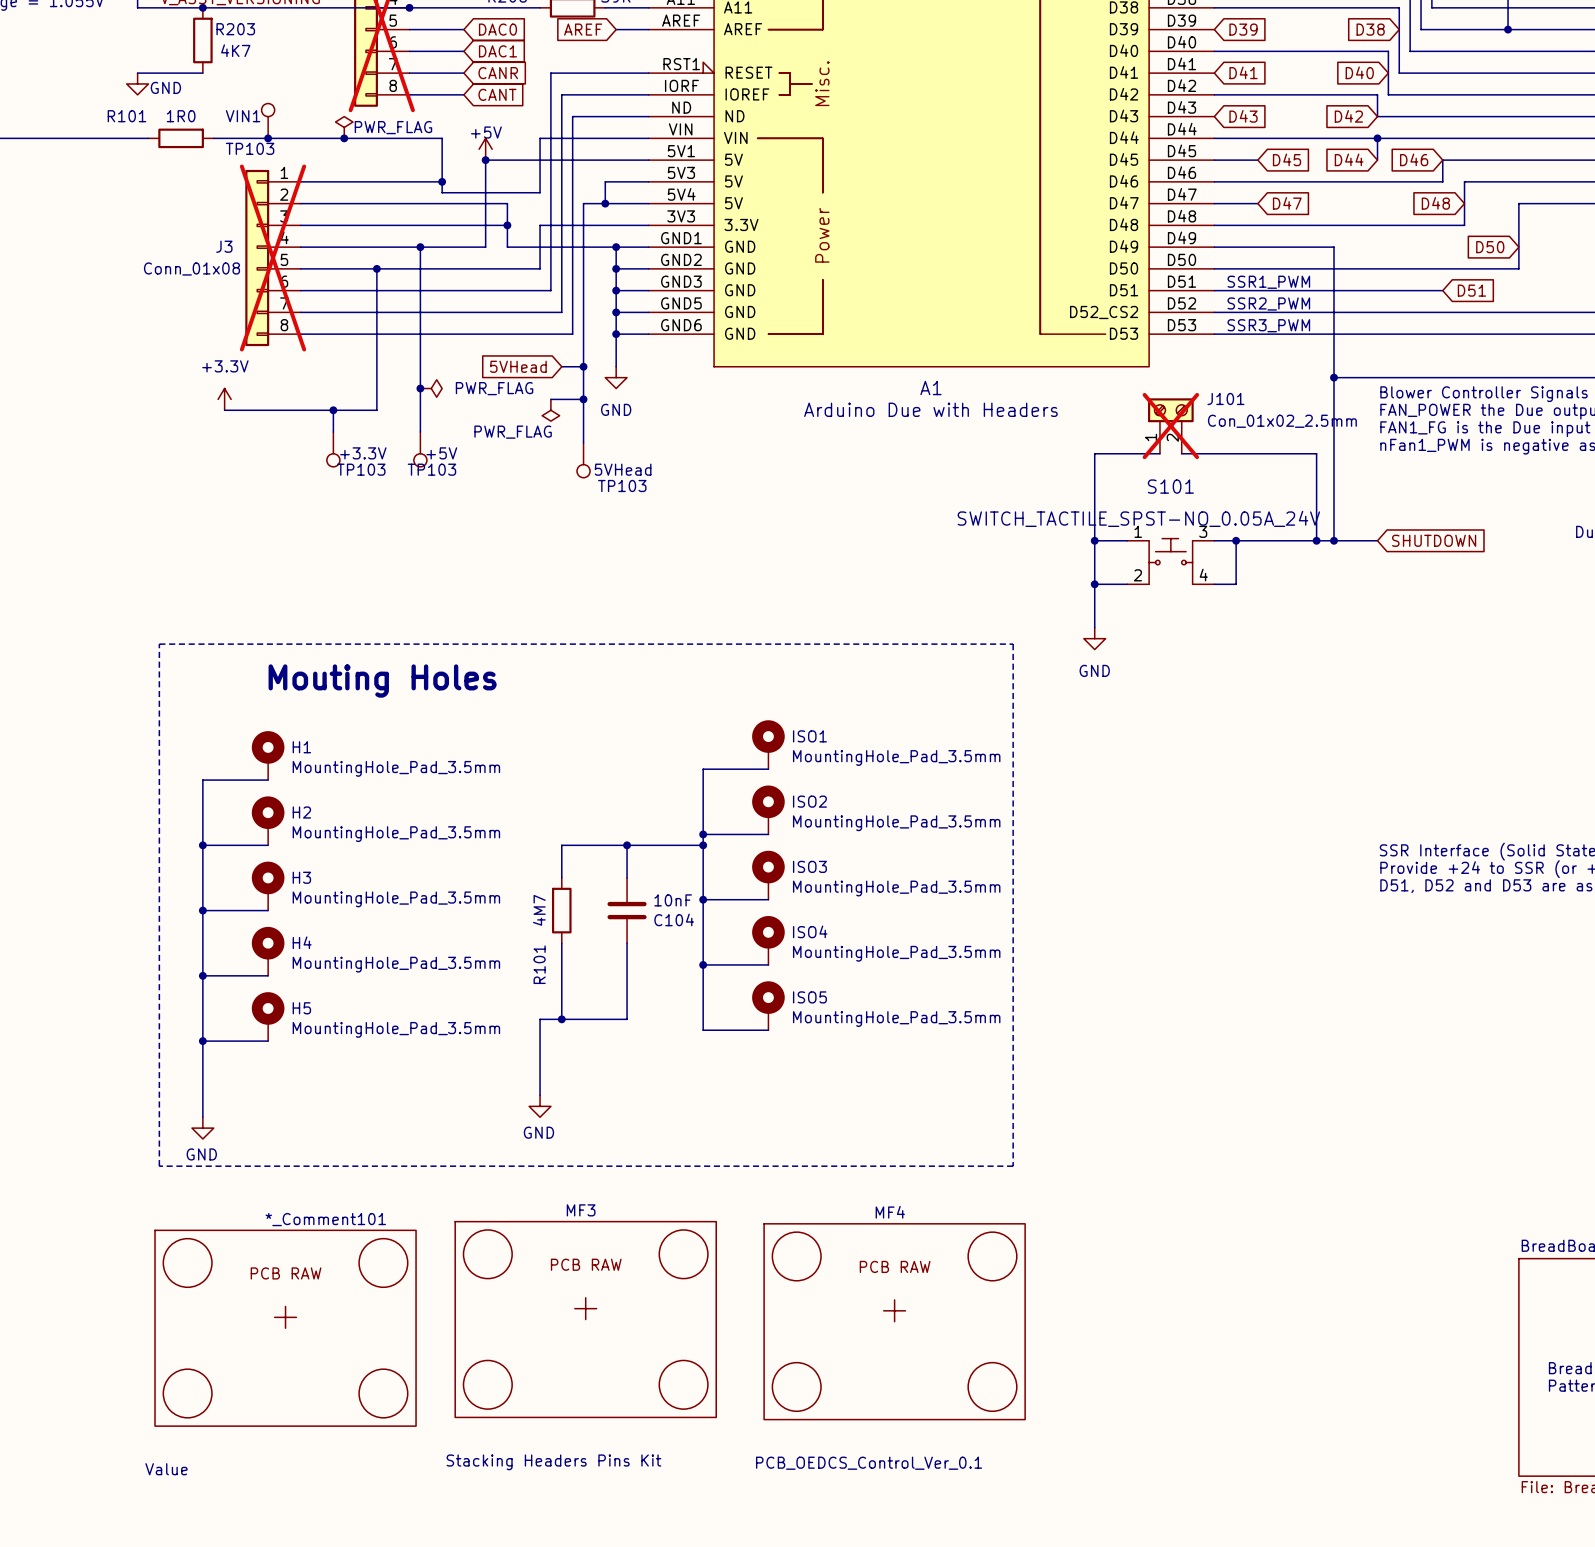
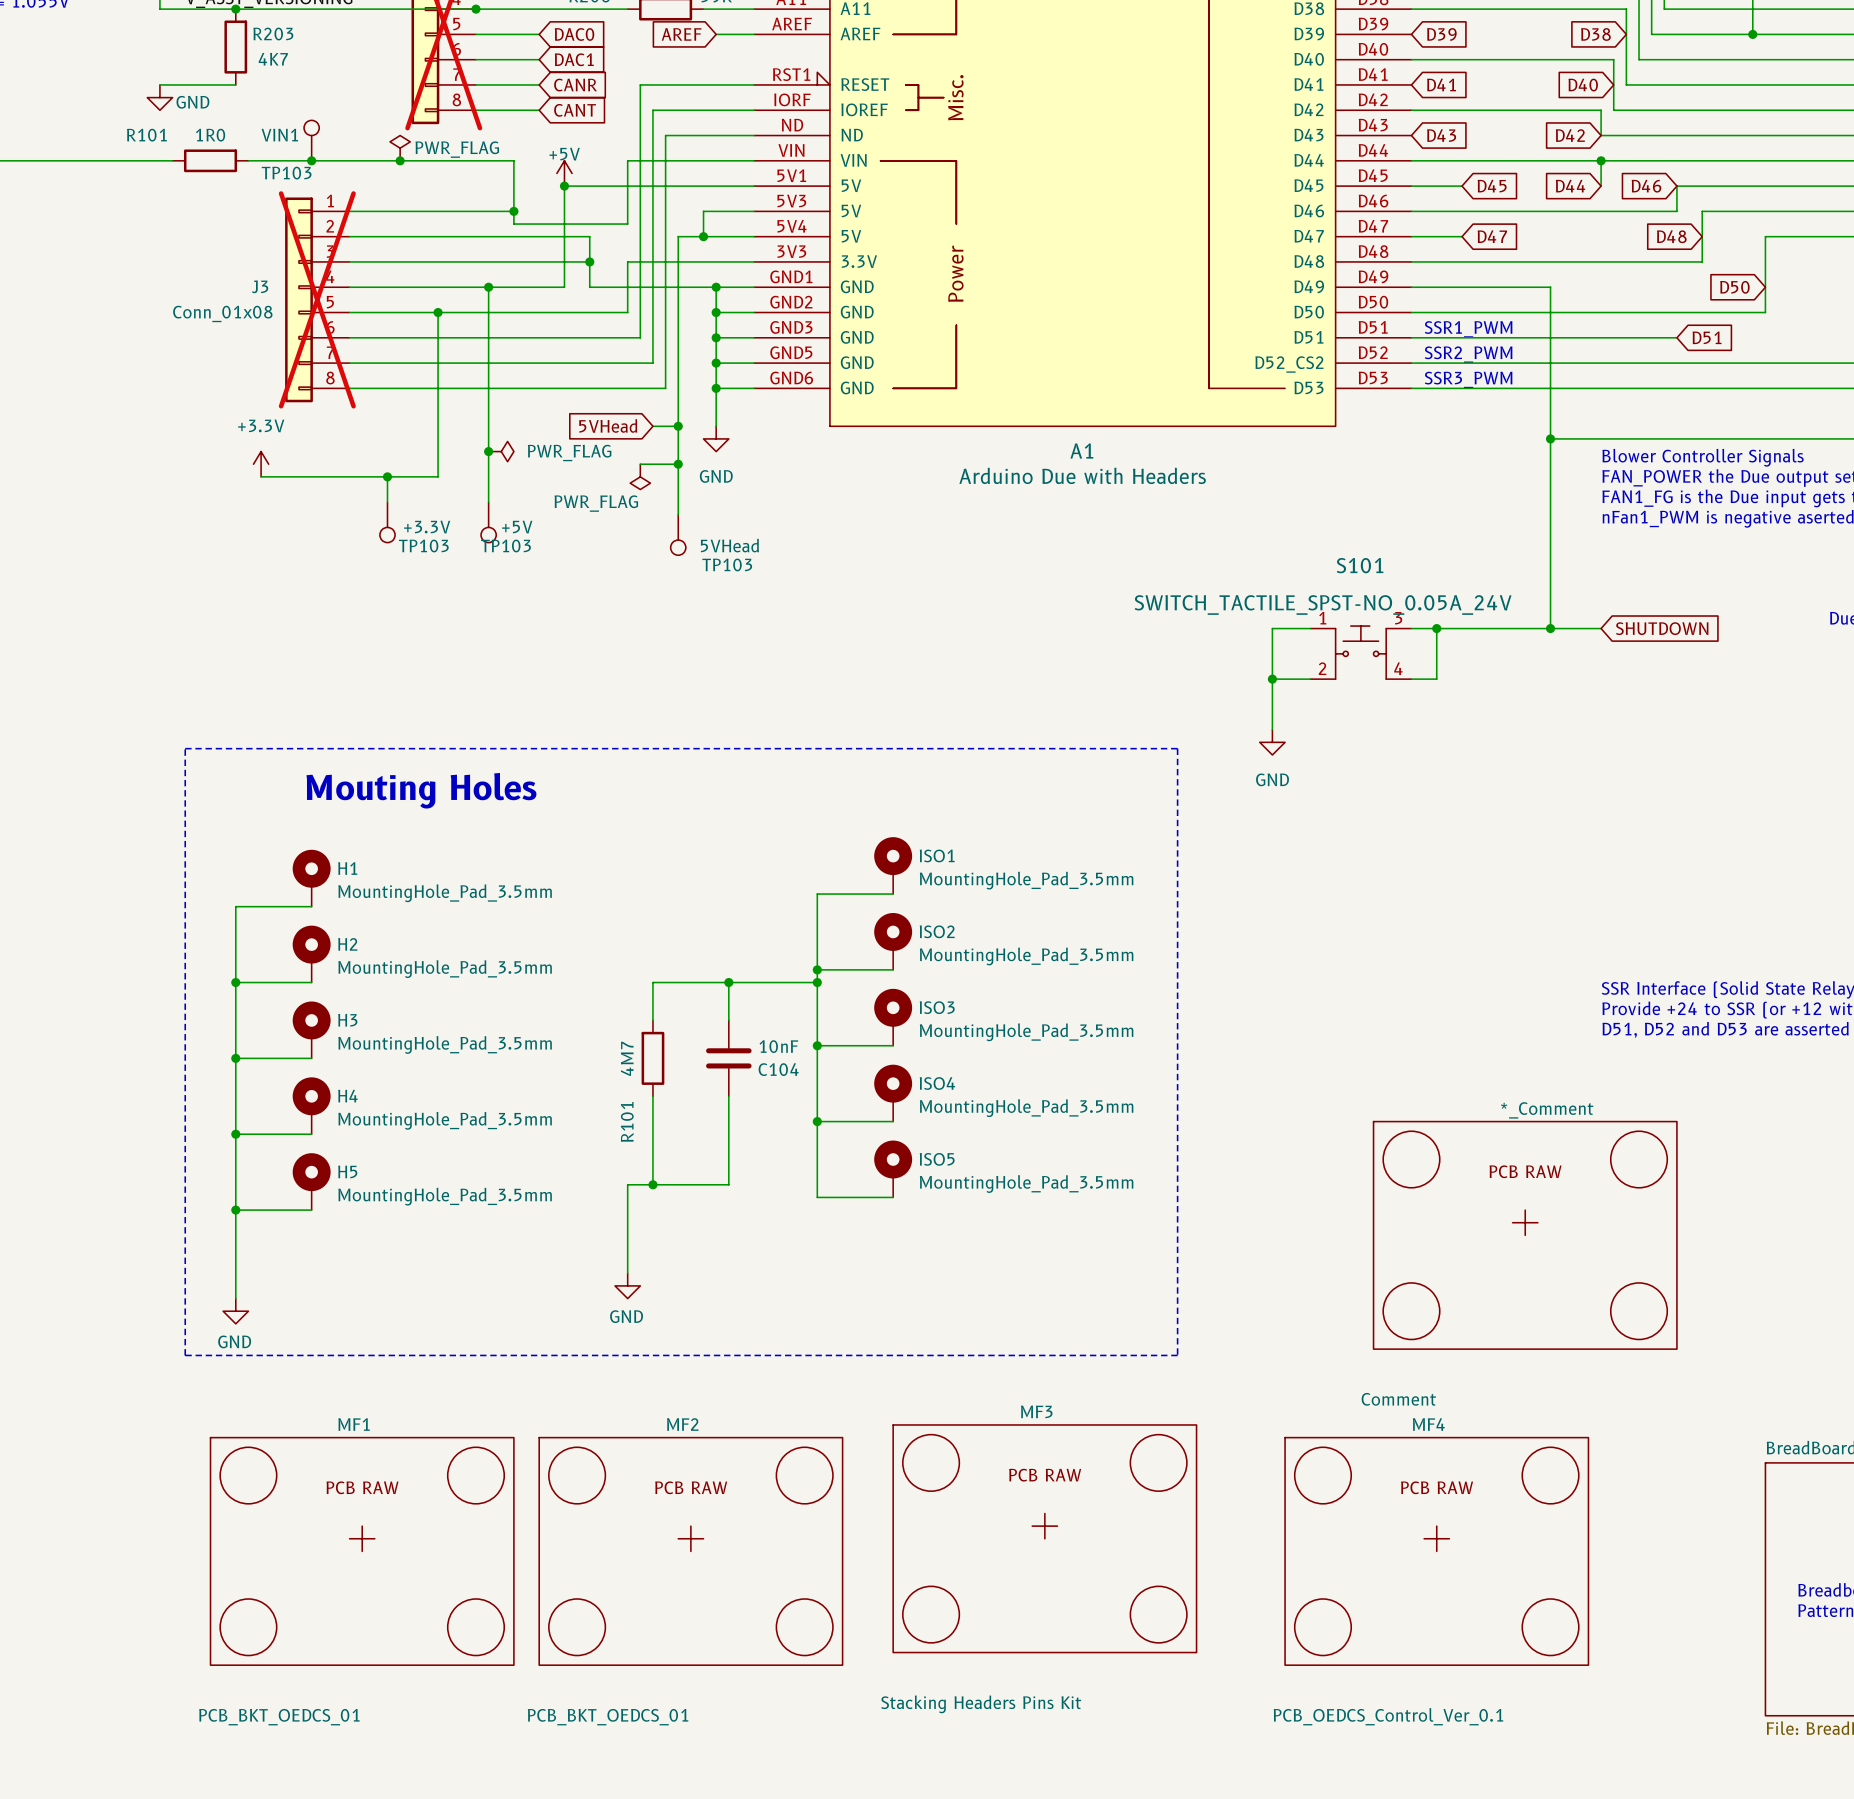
J101: Con_01x02_2.5mm (1170, 426) -> none
wire: (1159, 453) (1094, 453) (1094, 540) -> none
wire: (1181, 453) (1316, 453) (1316, 540) -> none
junction: (1094, 540) -> none
junction: (1316, 540) -> none
*_Comment: none -> Comment (1525, 1235)
MF3 position: (585, 1319) -> (1044, 1538)
MF4 position: (894, 1321) -> (1436, 1551)
*_Comment101: Value (285, 1328) -> none
MF1: none -> PCB_BKT_OEDCS_01 (362, 1551)
MF2: none -> PCB_BKT_OEDCS_01 (690, 1551)

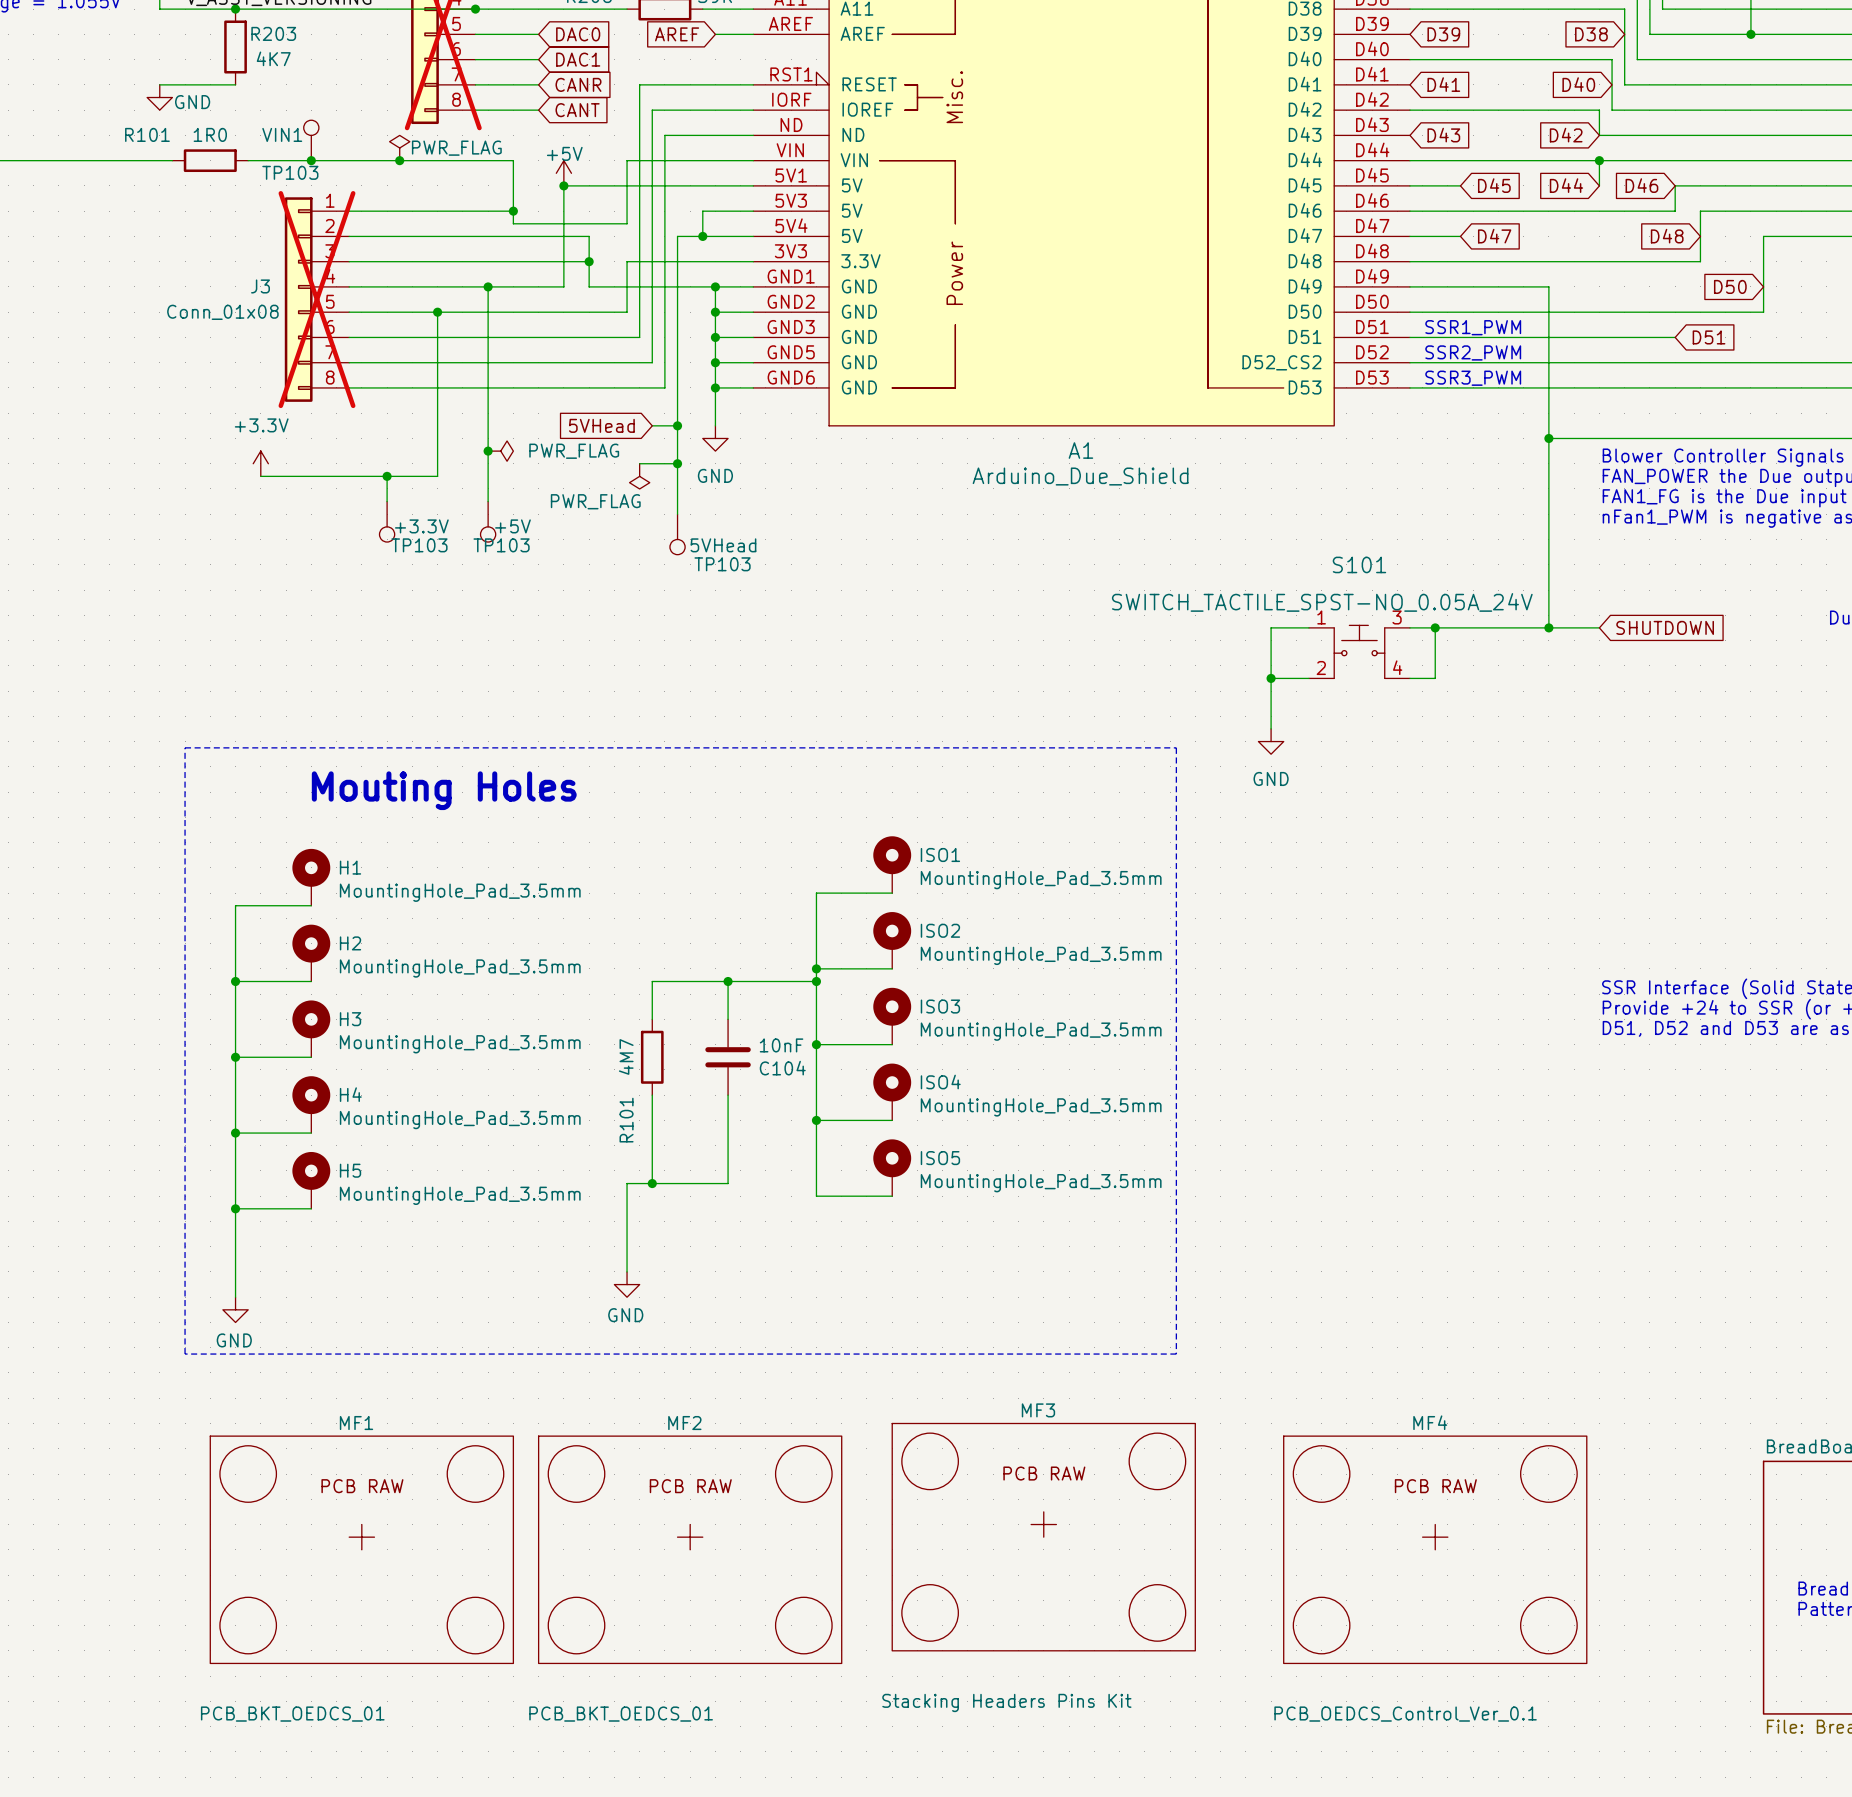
A1 value: Arduino Due with Headers (1082, 475) -> Arduino_Due_Shield (1080, 476)
*_Comment: Comment (1525, 1235) -> none

